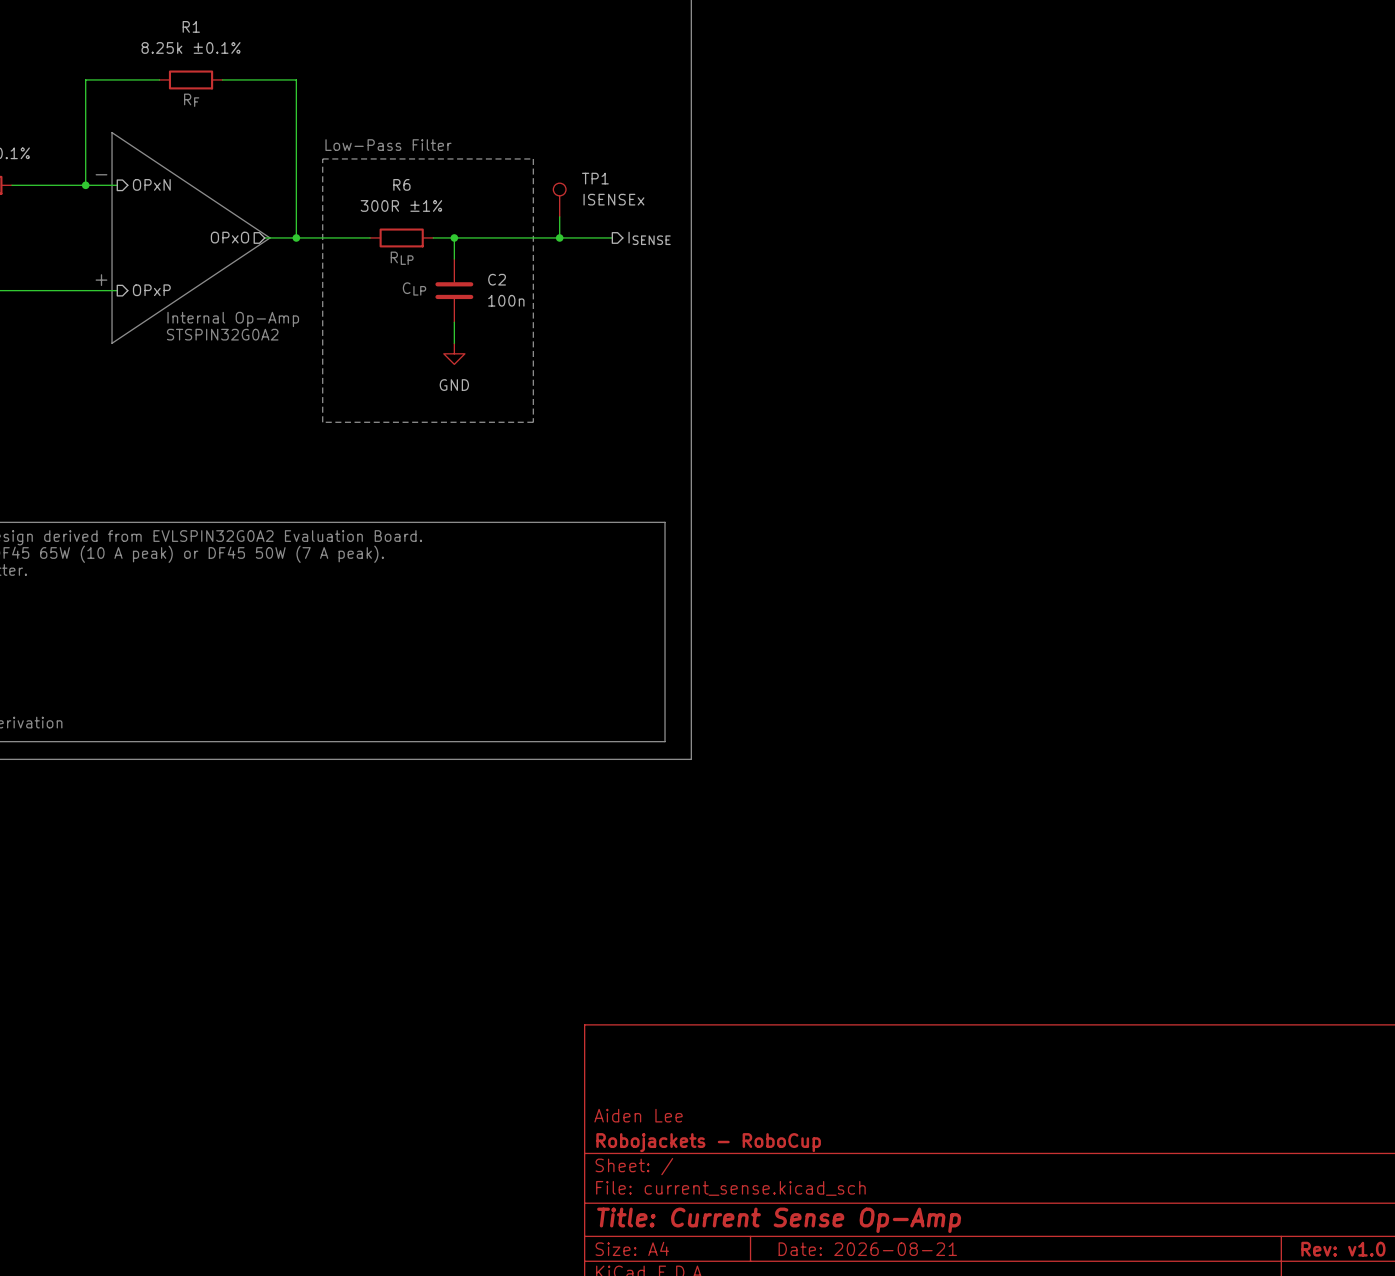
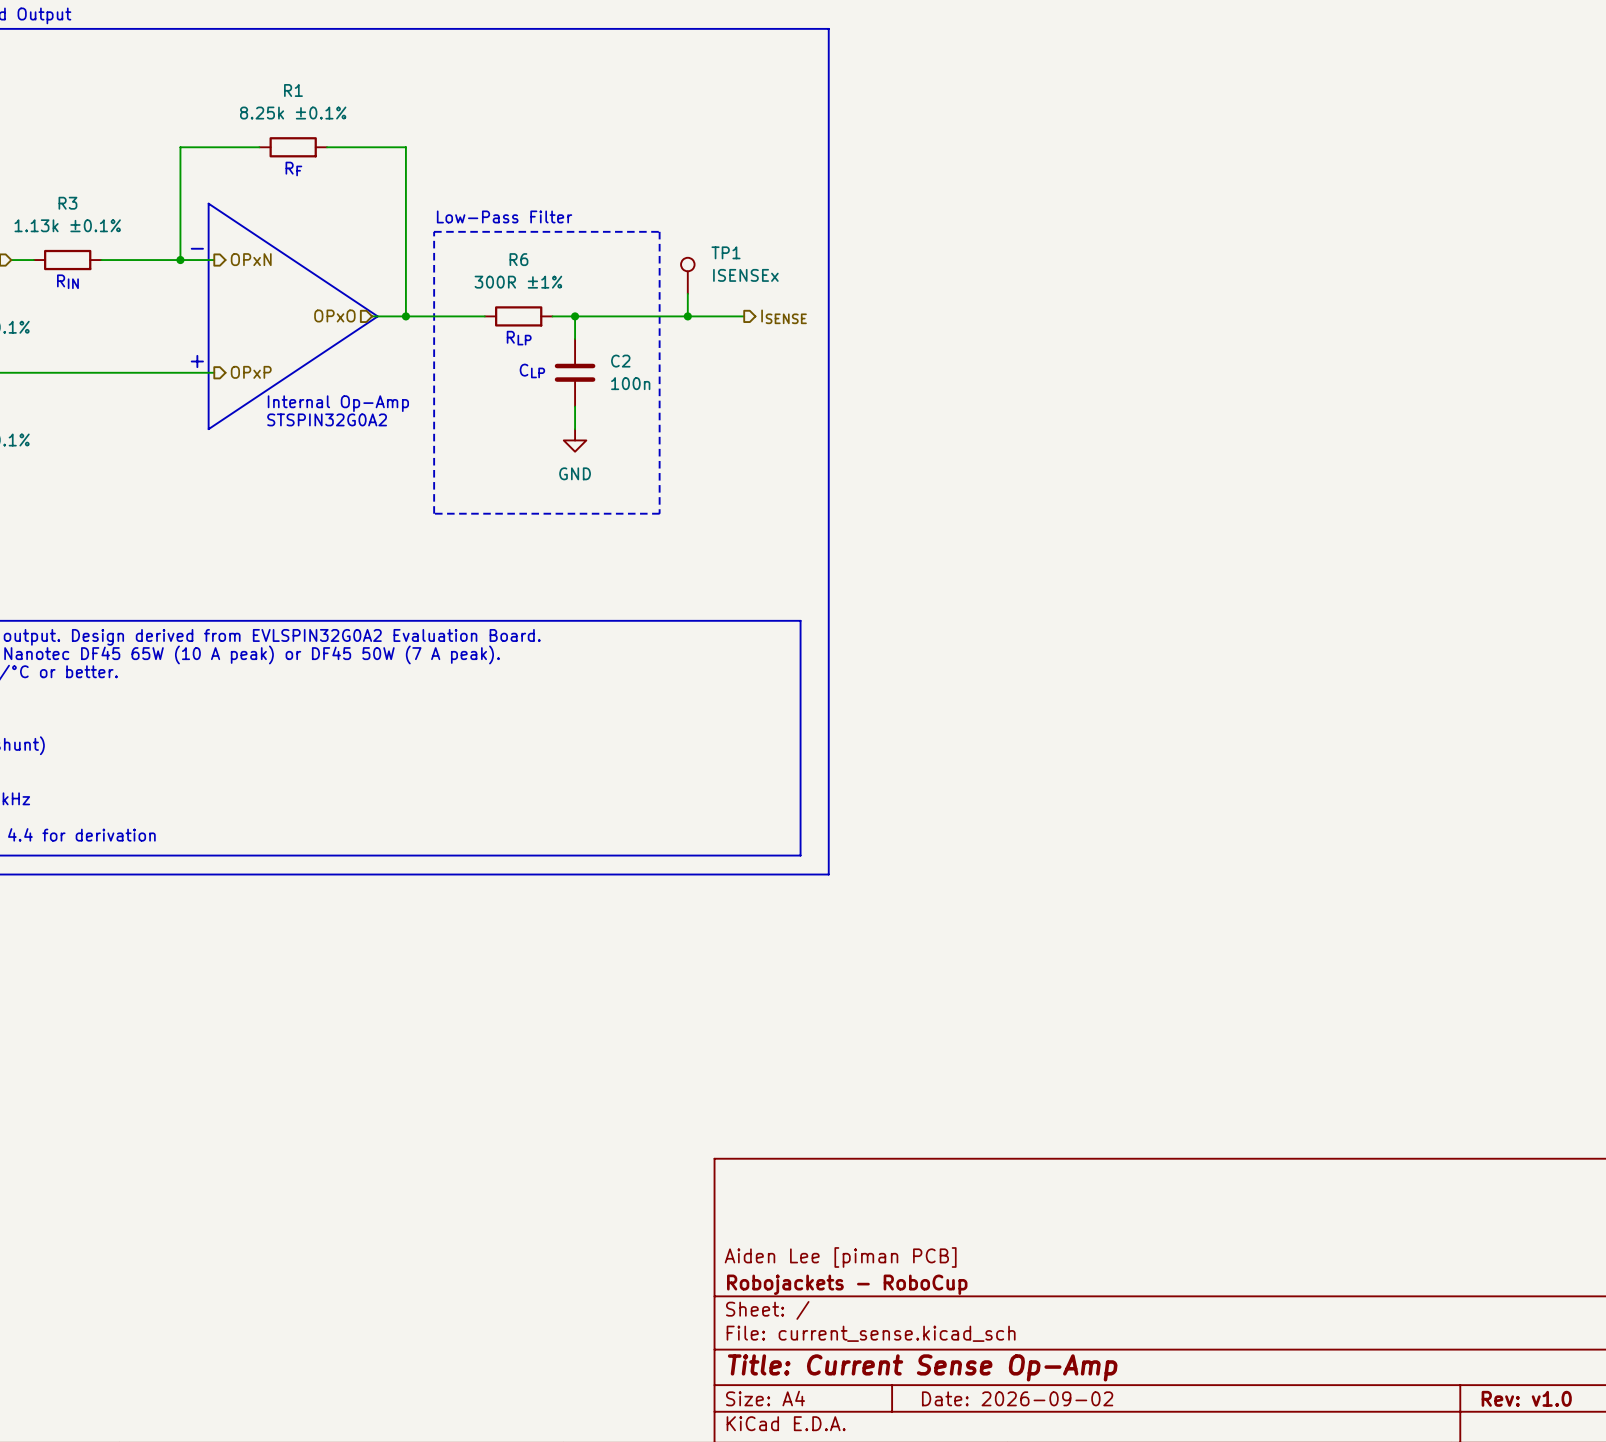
title block: Aiden Lee (638, 1115) -> Aiden Lee [piman PCB] (840, 1257)
title block: Date: 2026-08-21 (867, 1249) -> Date: 2026-09-02 (1017, 1398)

